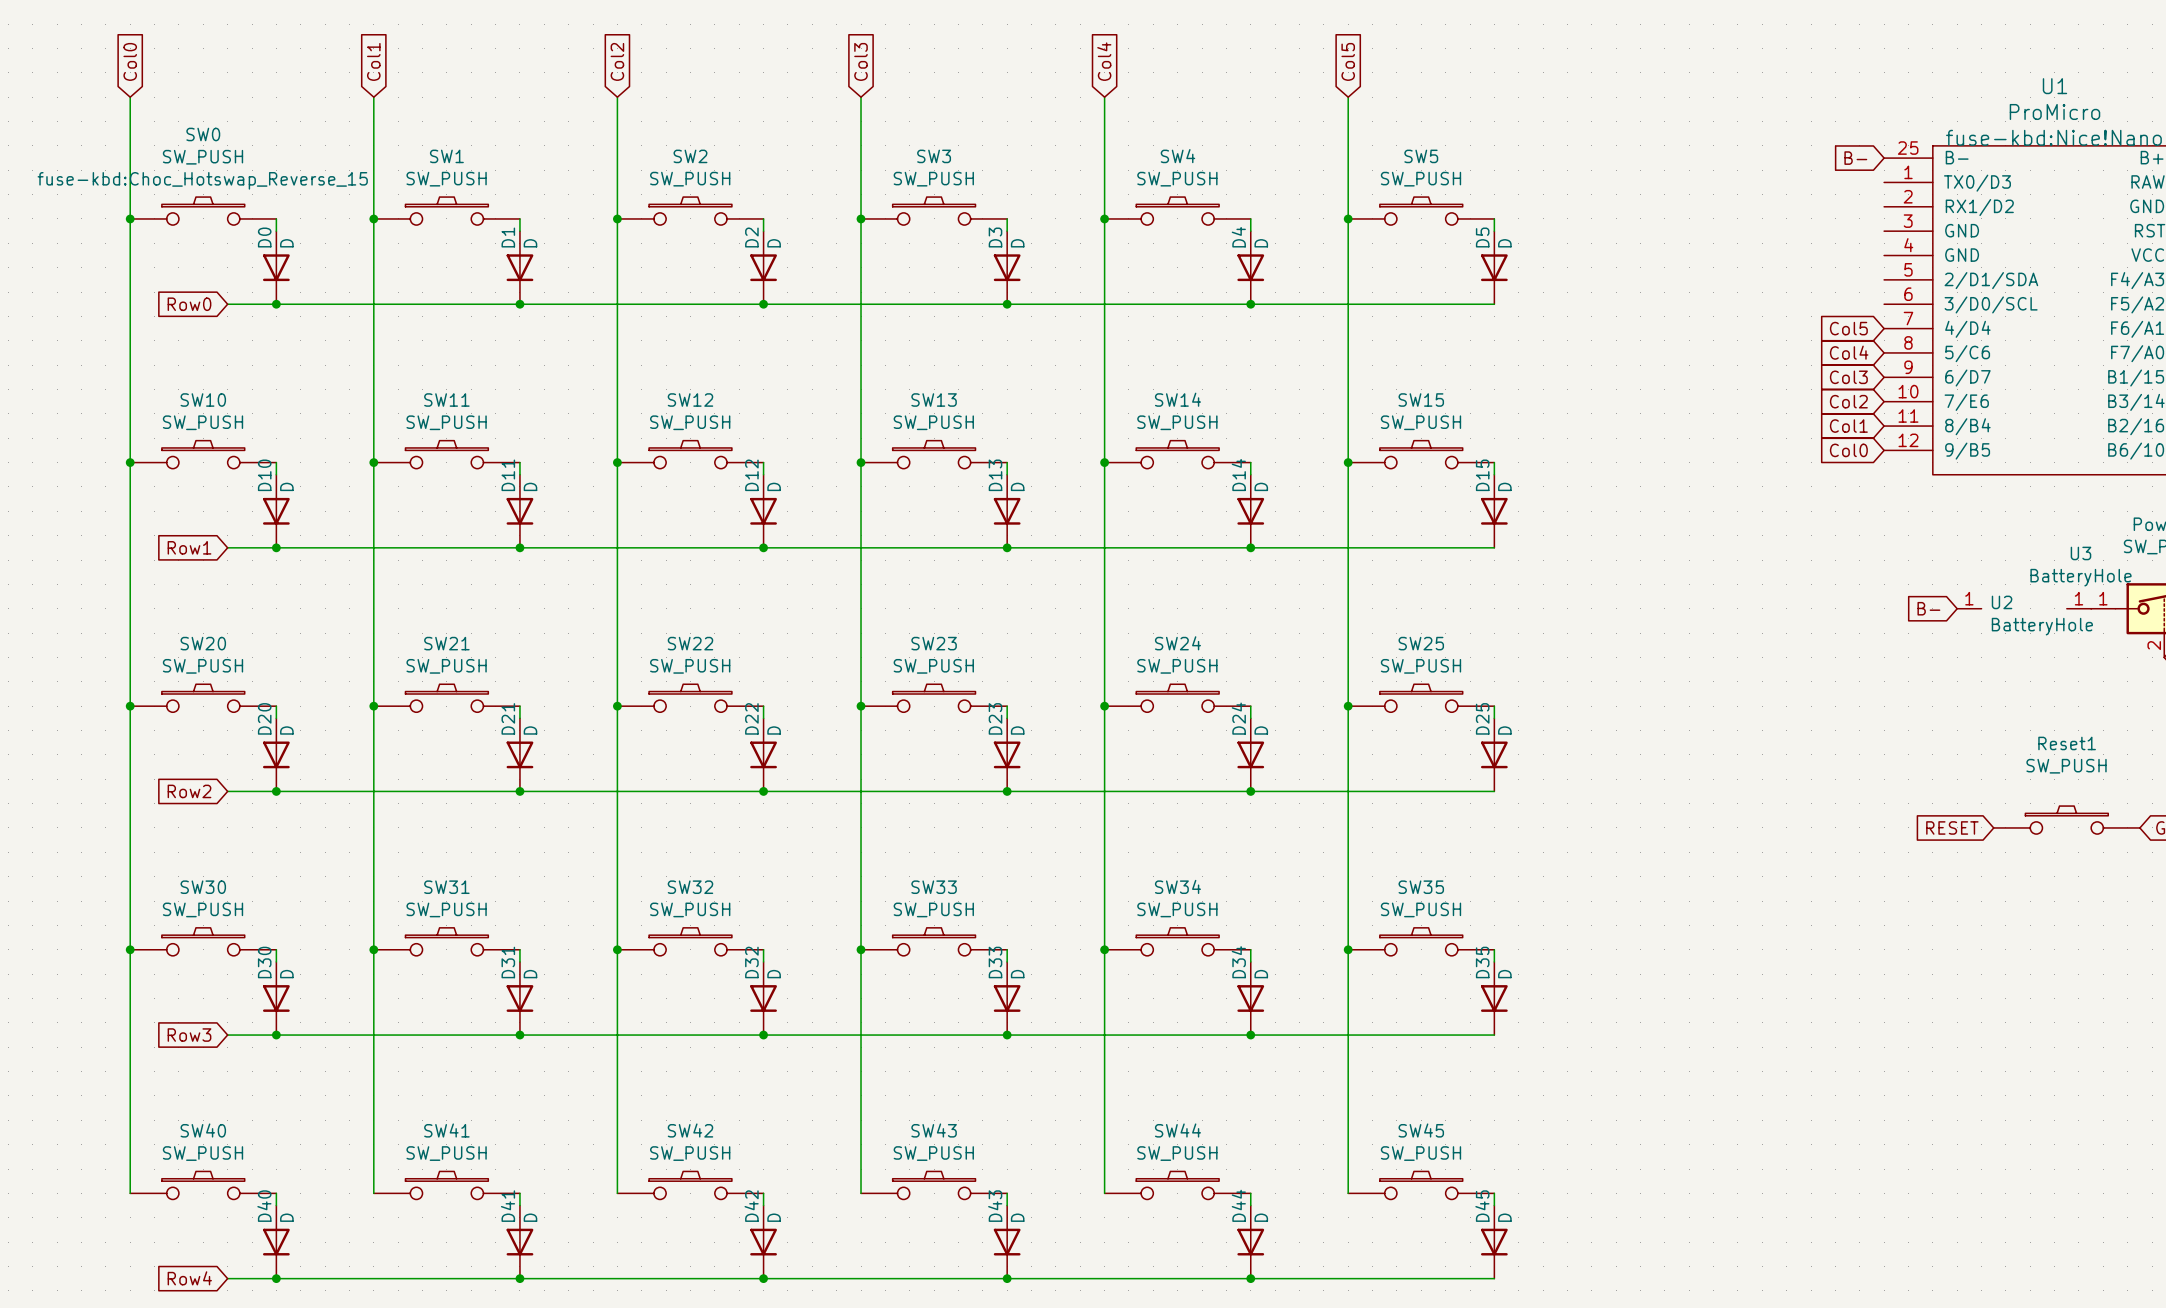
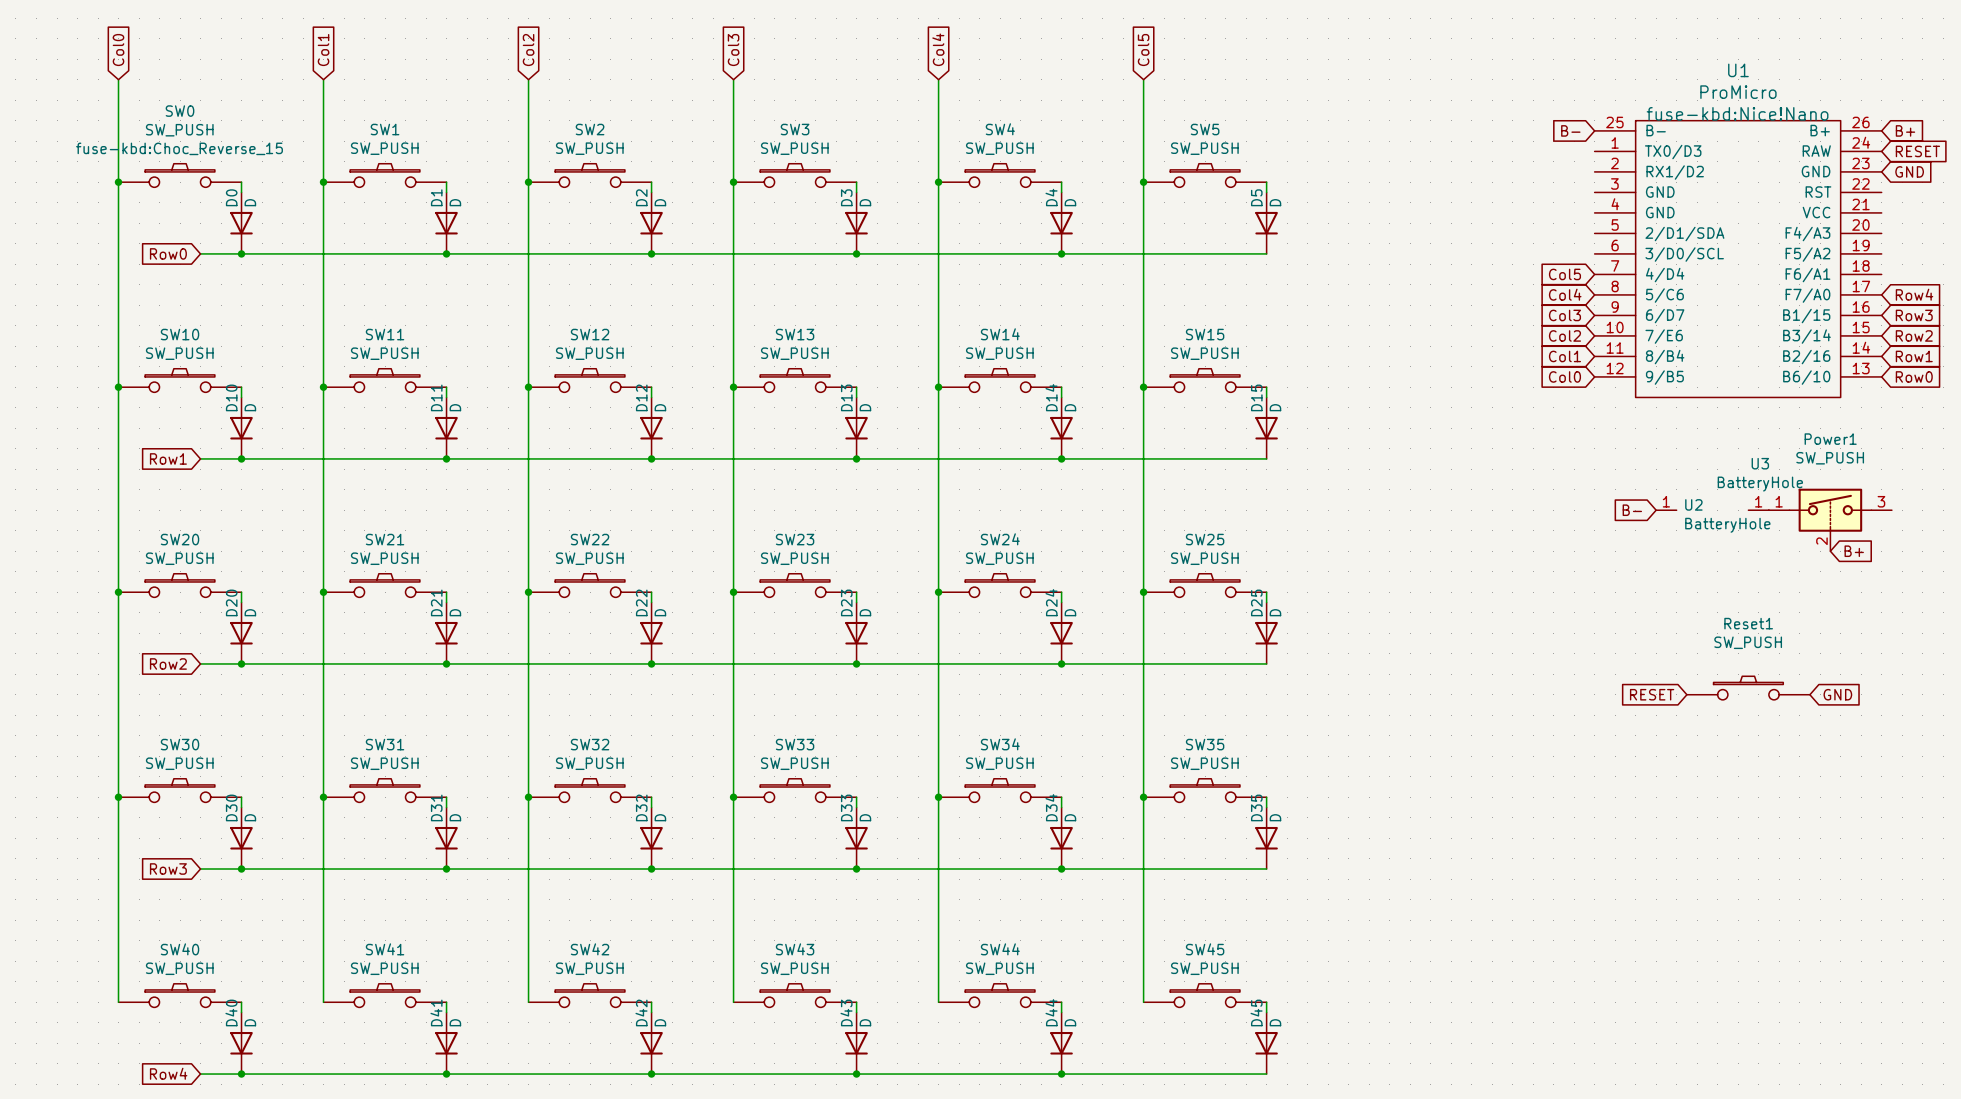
SW0 text: fuse-kbd:Choc_Hotswap_Reverse_15 (202, 180) -> fuse-kbd:Choc_Reverse_15 (179, 148)

